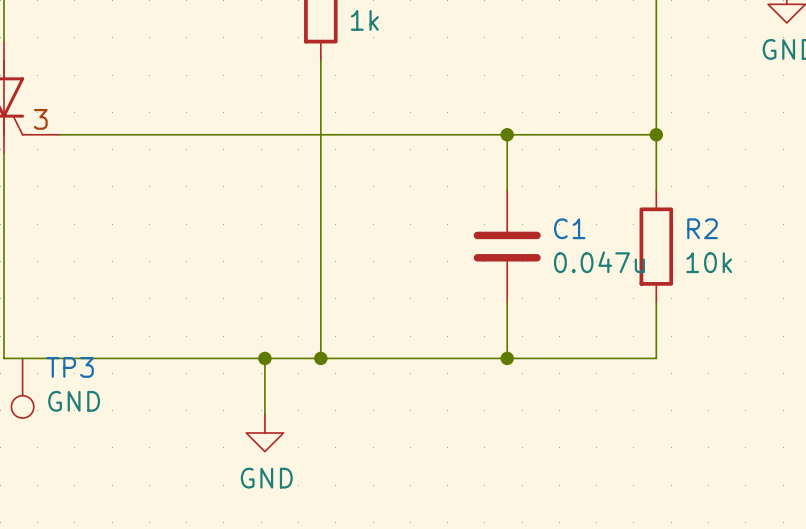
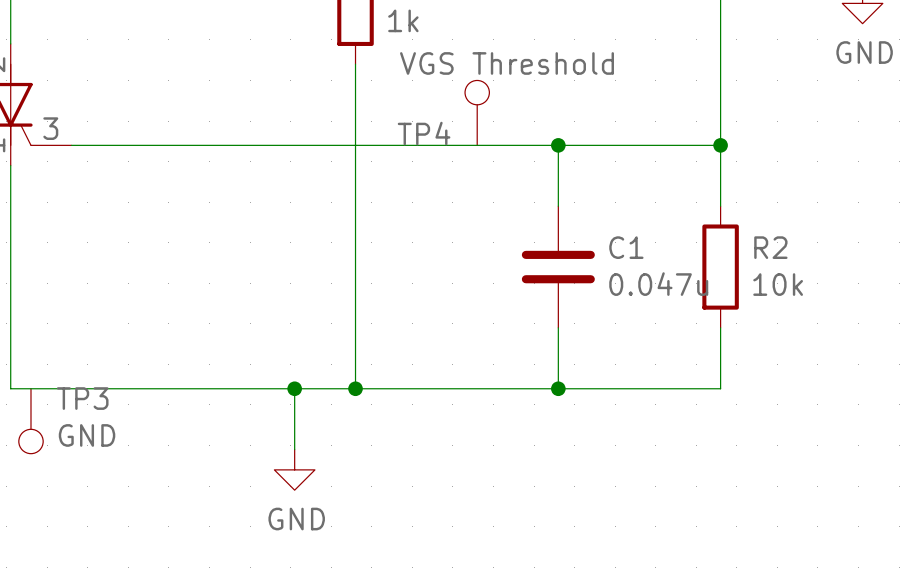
TP4: none -> VGS Threshold (477, 112)

